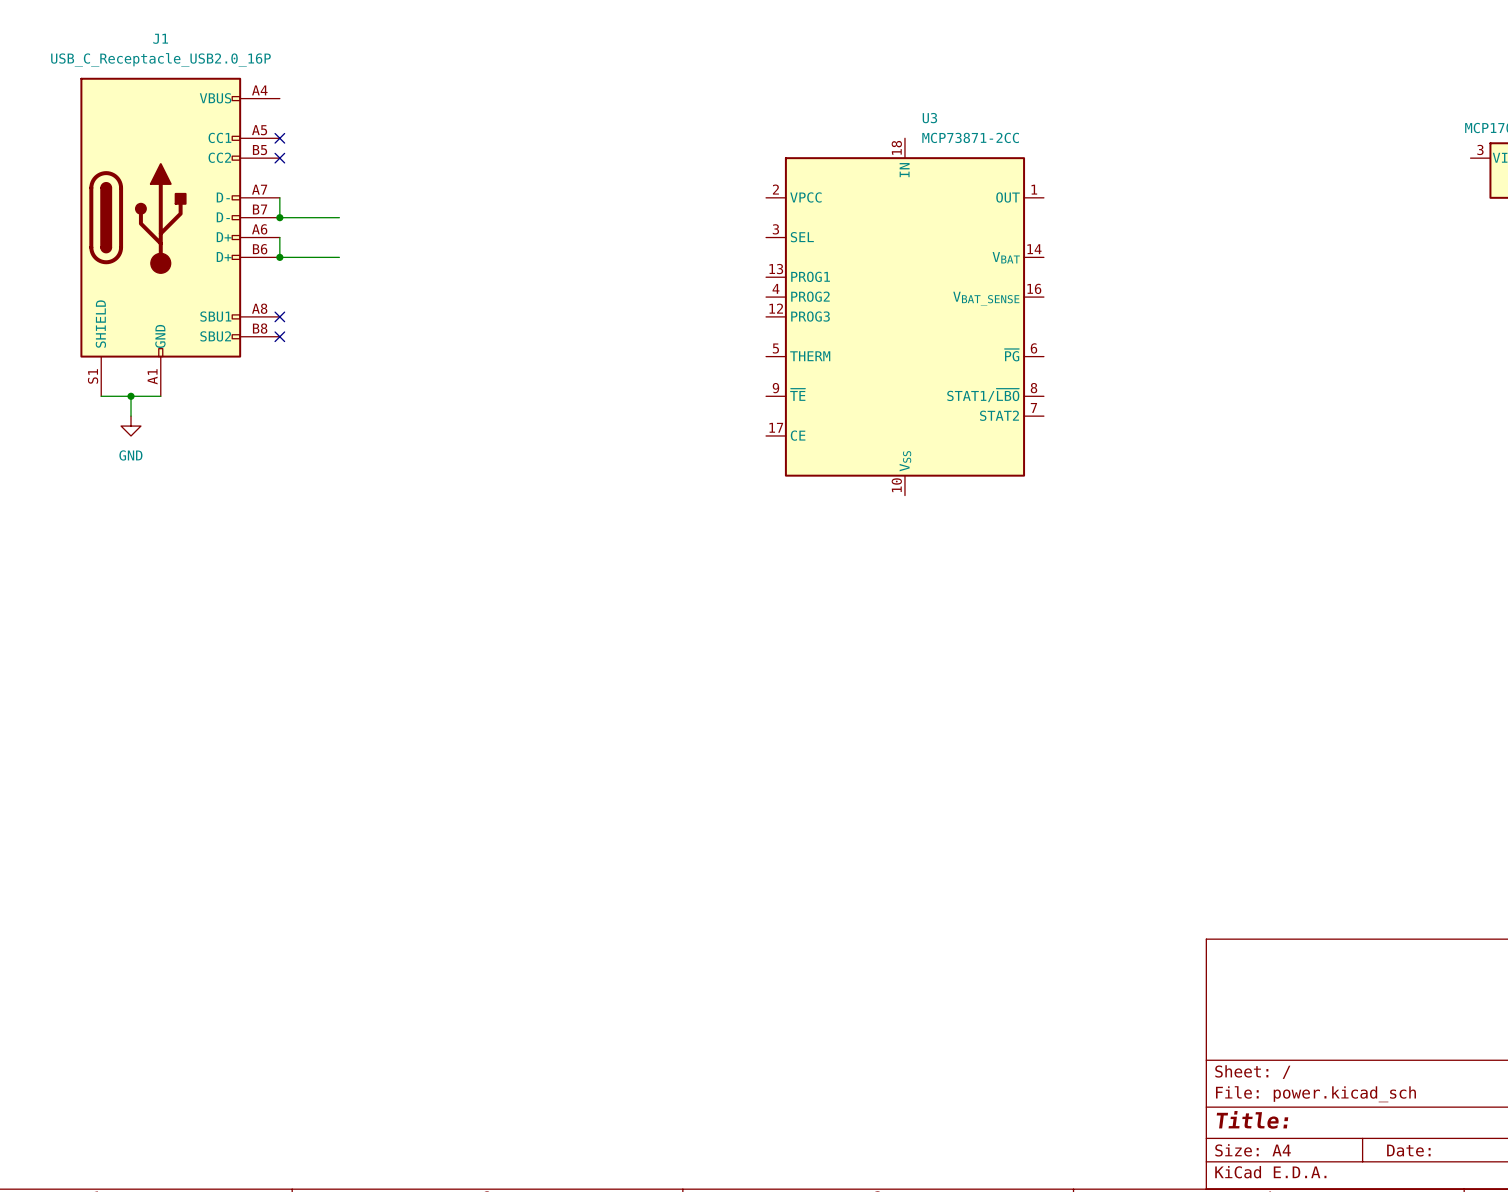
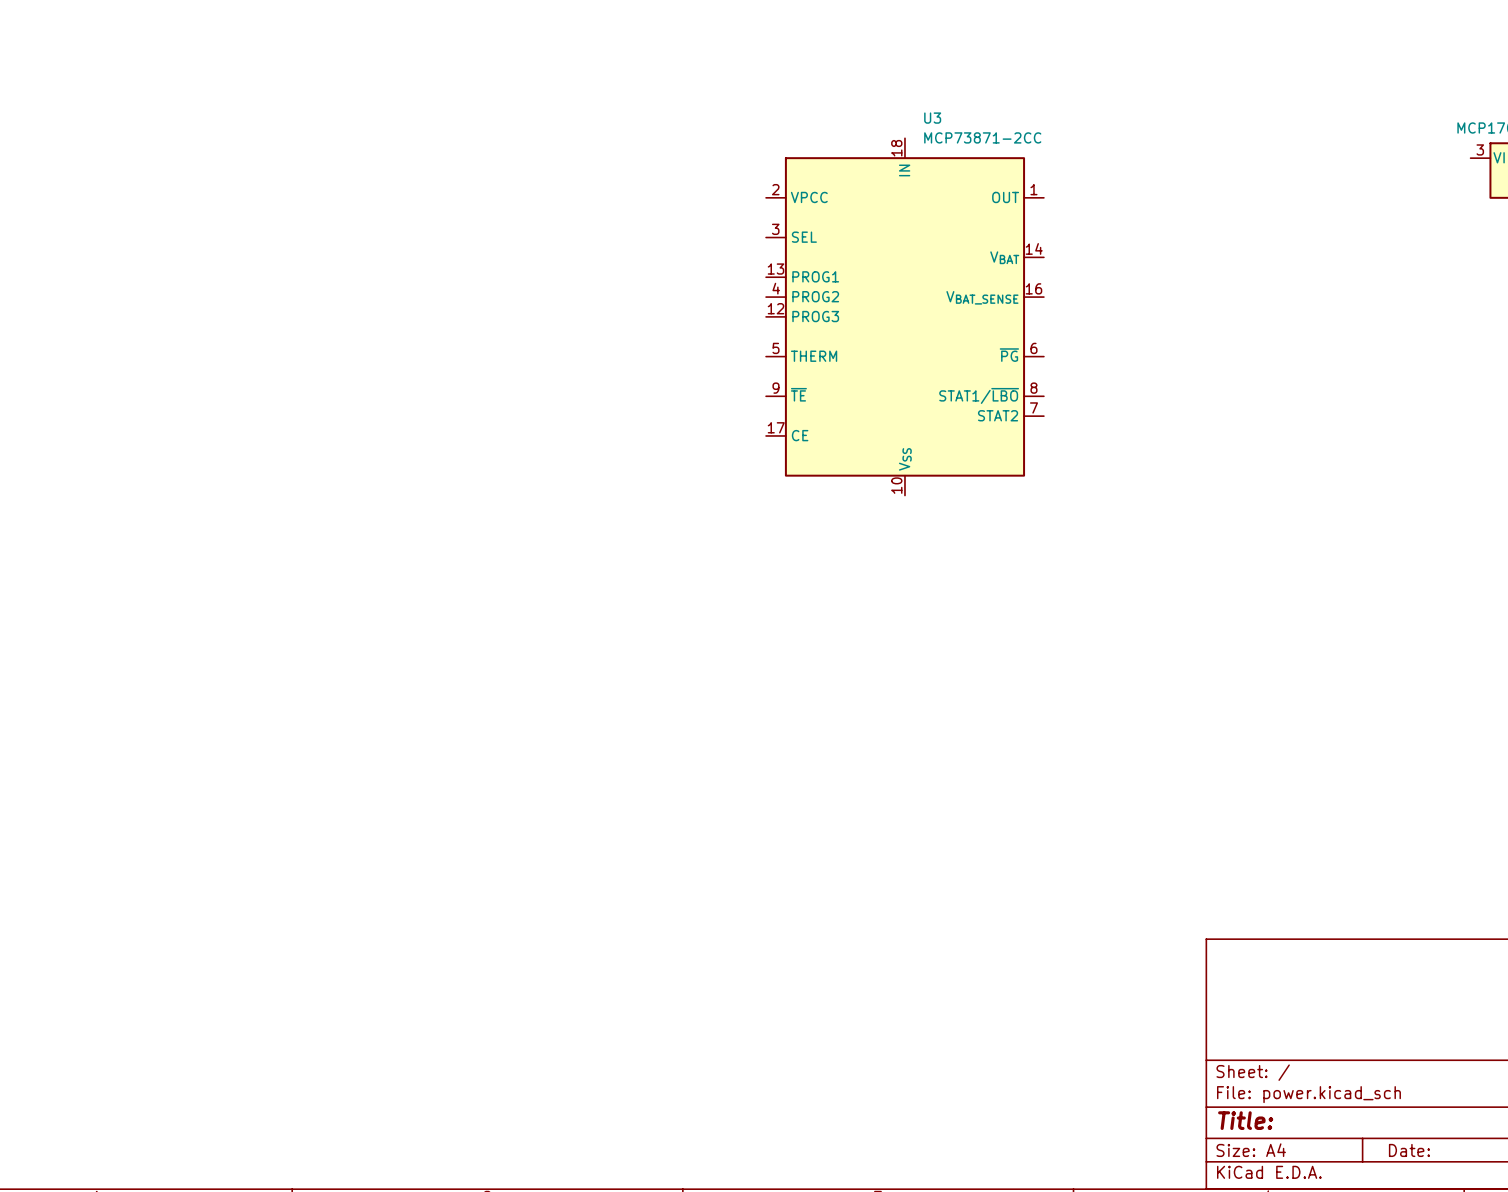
no-connect mark: (279, 138) -> none
no-connect mark: (279, 158) -> none
wire: (279, 197) (279, 217) (339, 217) -> none
junction: (279, 217) -> none
J1: USB_C_Receptacle_USB2.0_16P (180, 237) -> none
wire: (279, 237) (279, 257) (339, 257) -> none
junction: (279, 257) -> none
no-connect mark: (279, 316) -> none
no-connect mark: (279, 336) -> none
wire: (101, 396) (160, 396) -> none
wire: (131, 396) (131, 416) -> none
junction: (131, 396) -> none
power symbol: GND (131, 426) -> none

